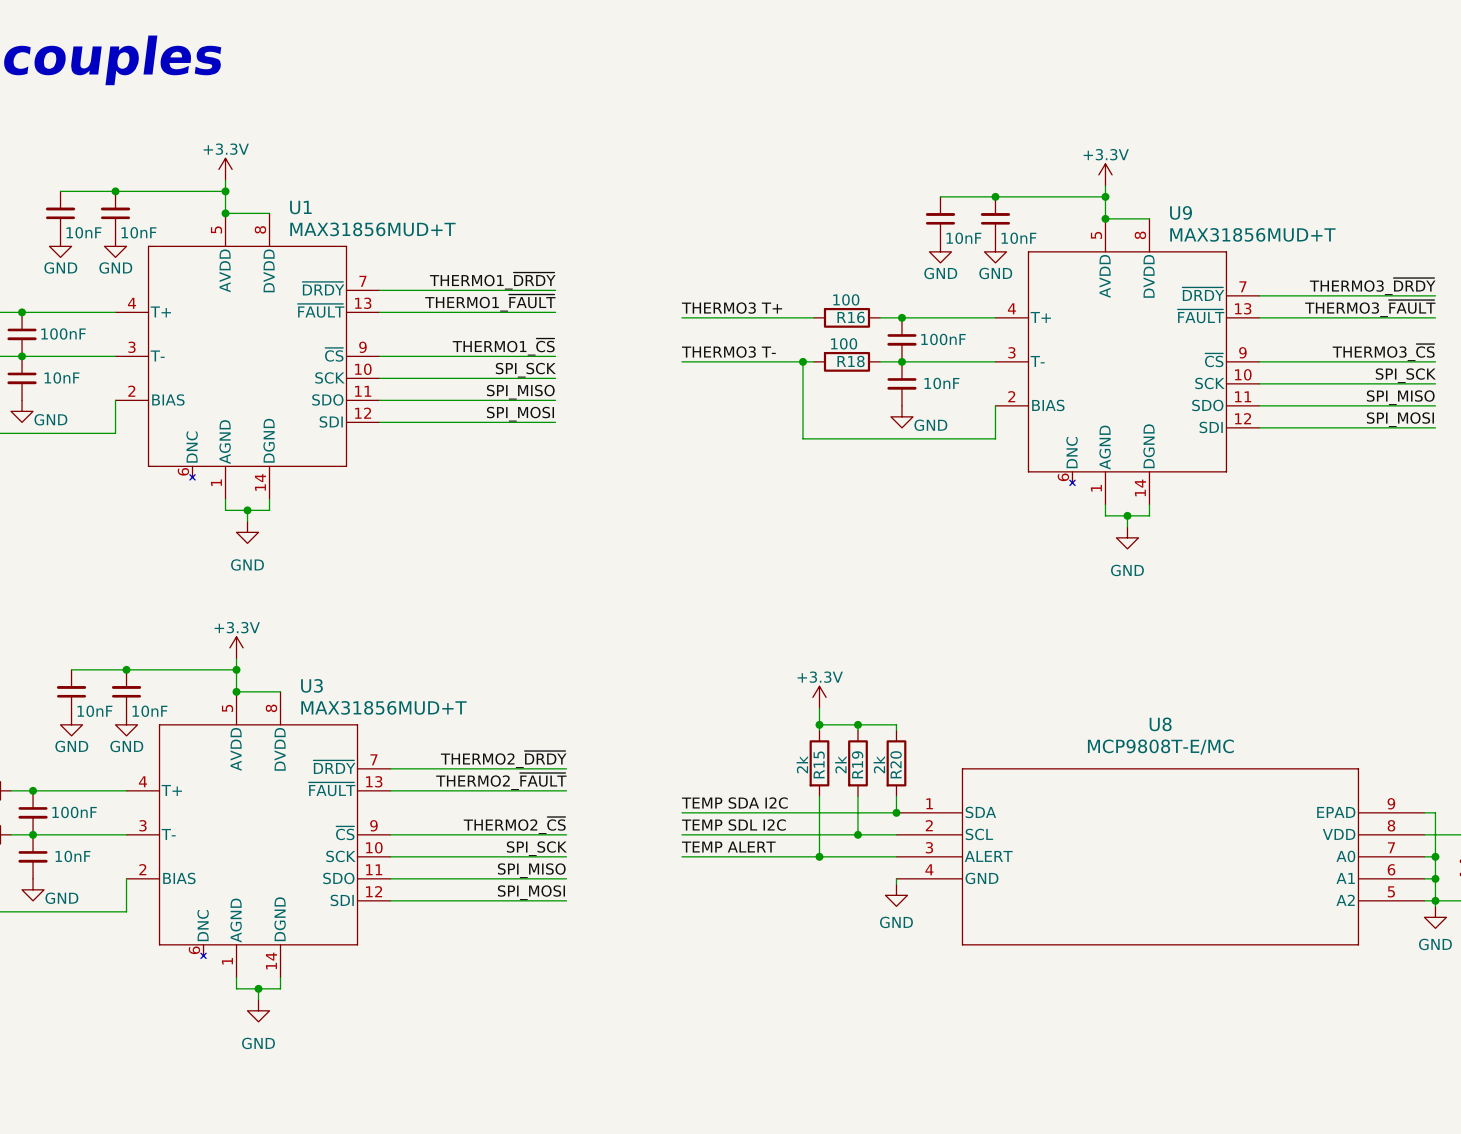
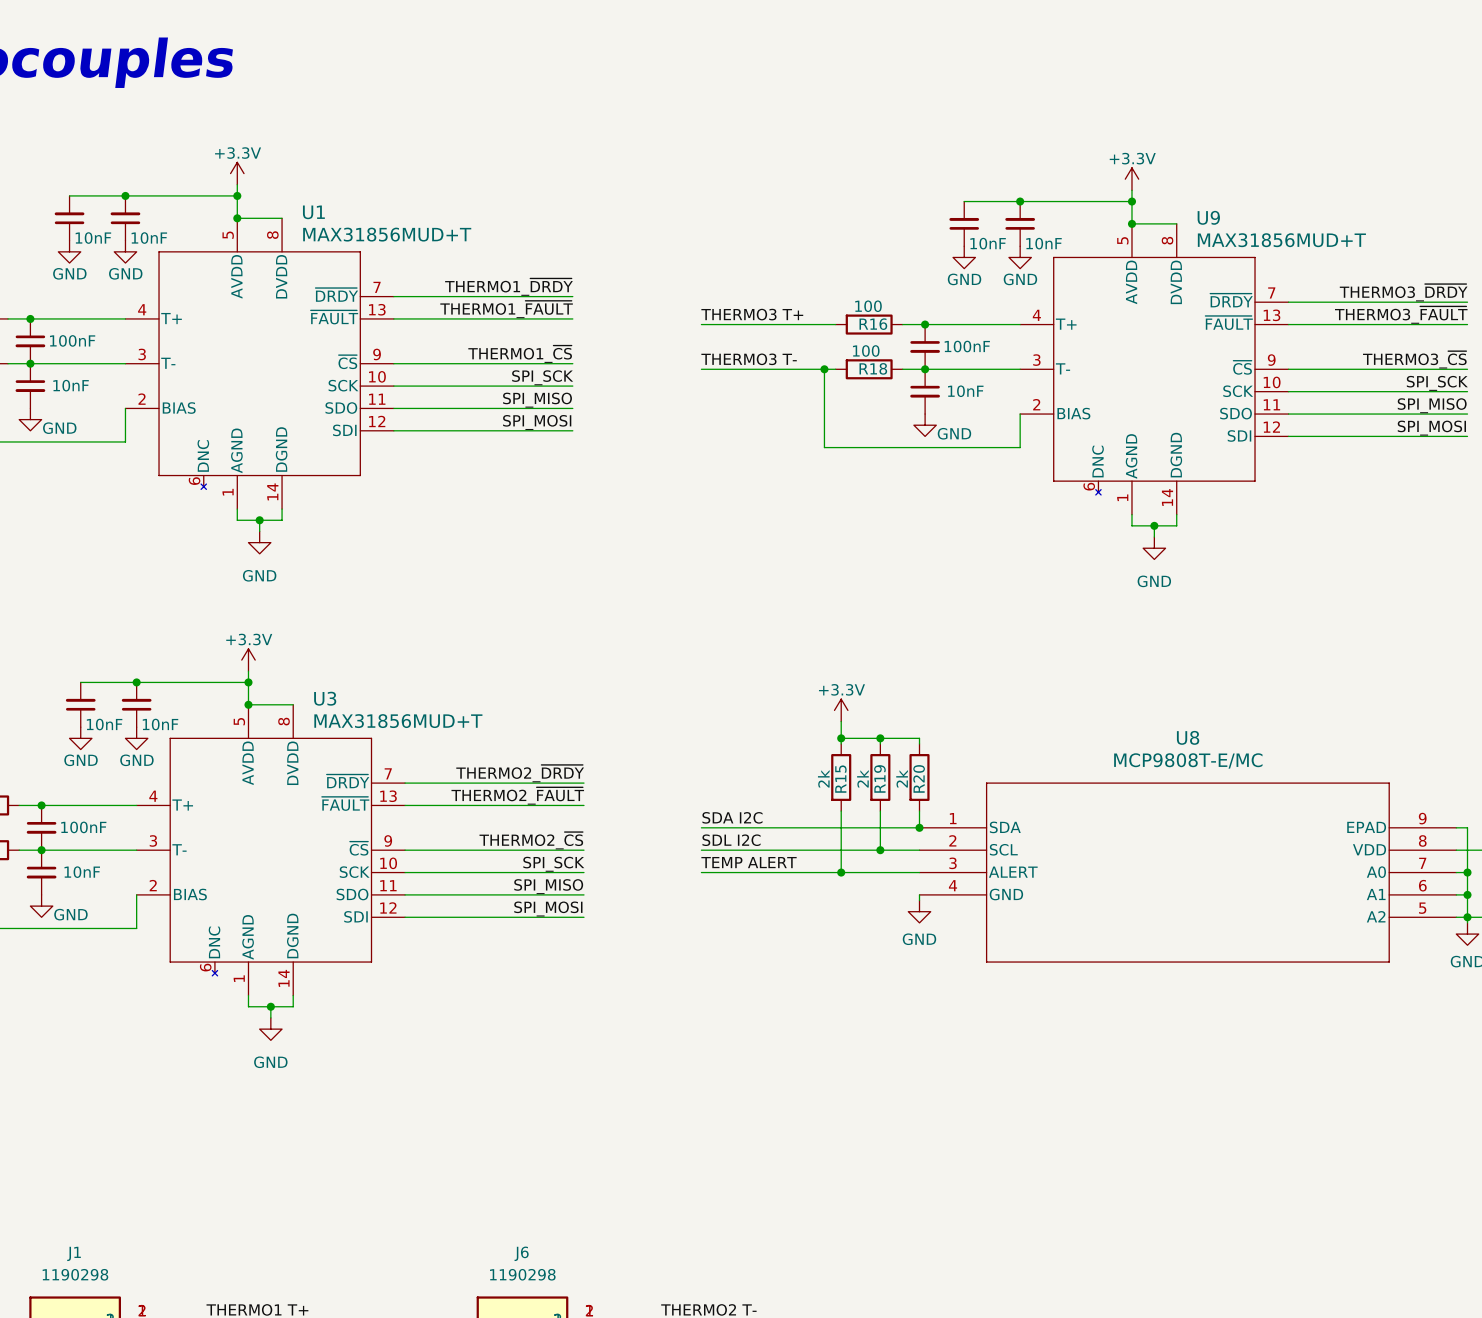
label: TEMP SDA I2C (734, 803) -> SDA I2C (732, 817)
label: TEMP SDL I2C (733, 825) -> SDL I2C (731, 840)

